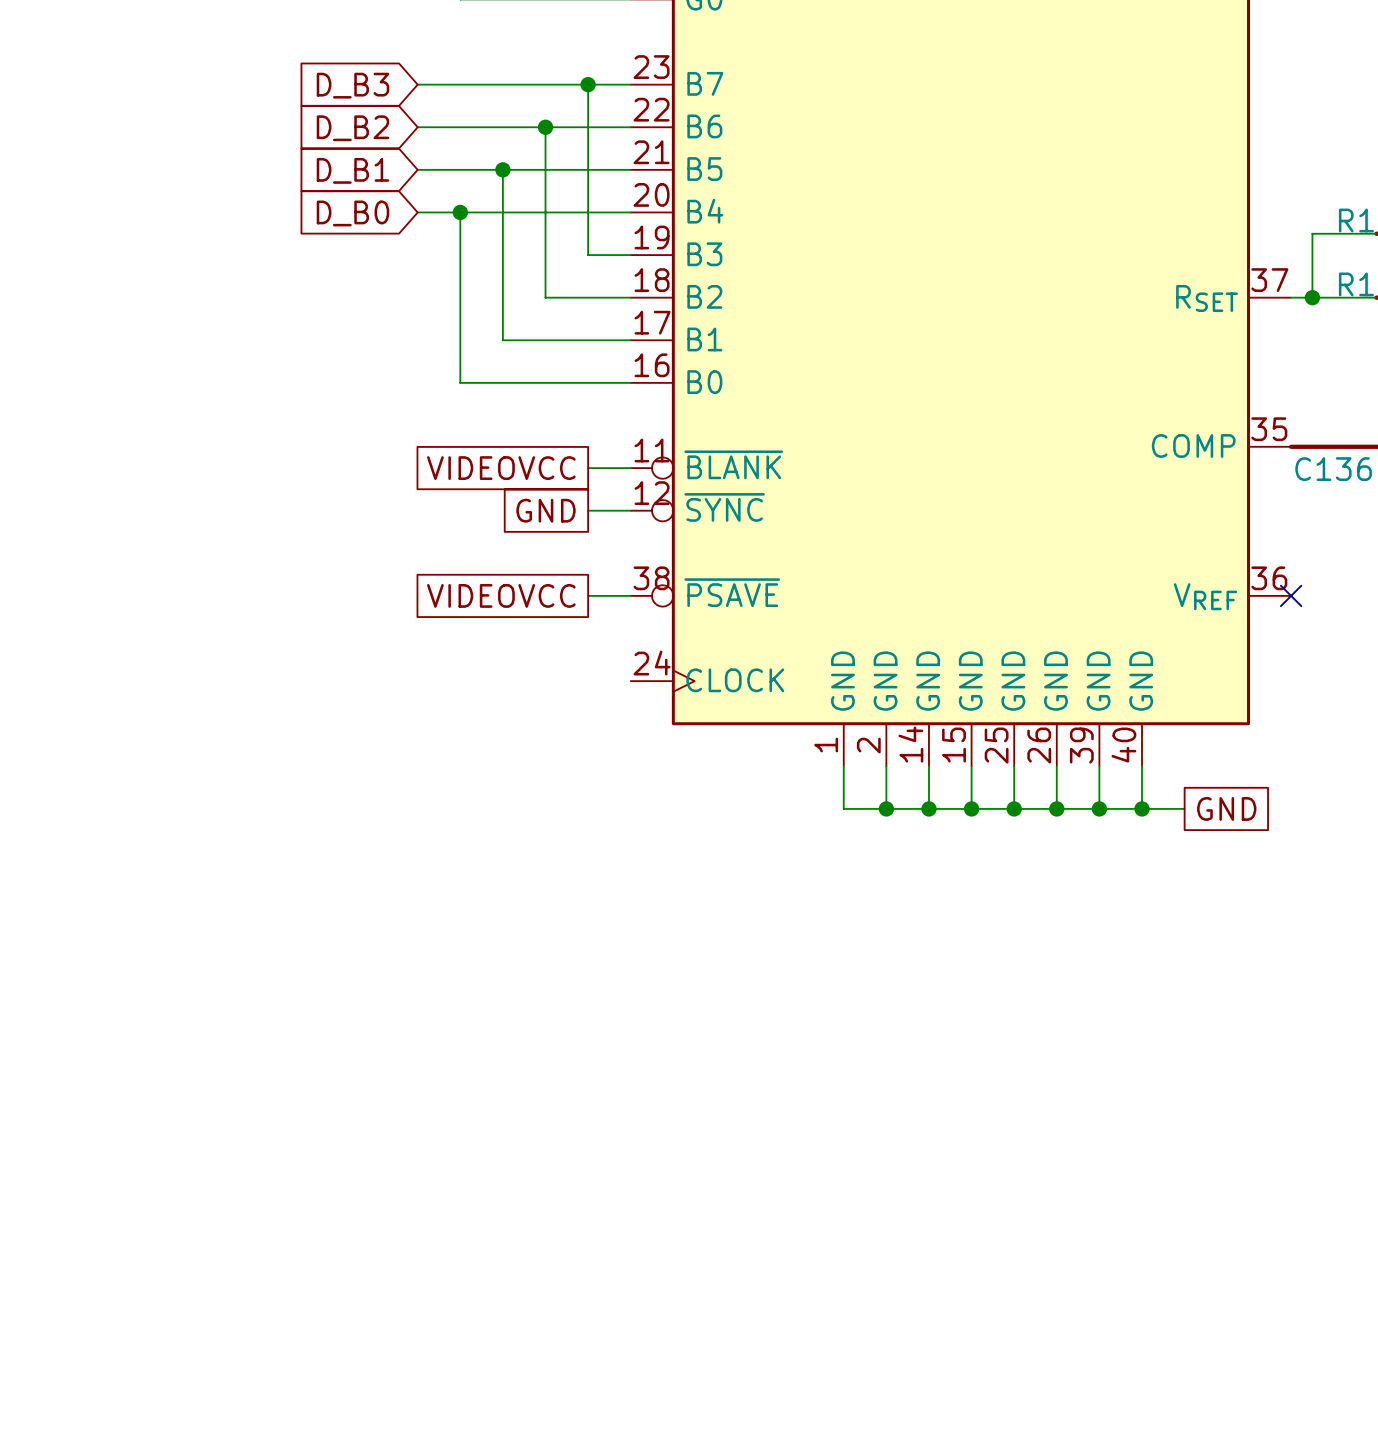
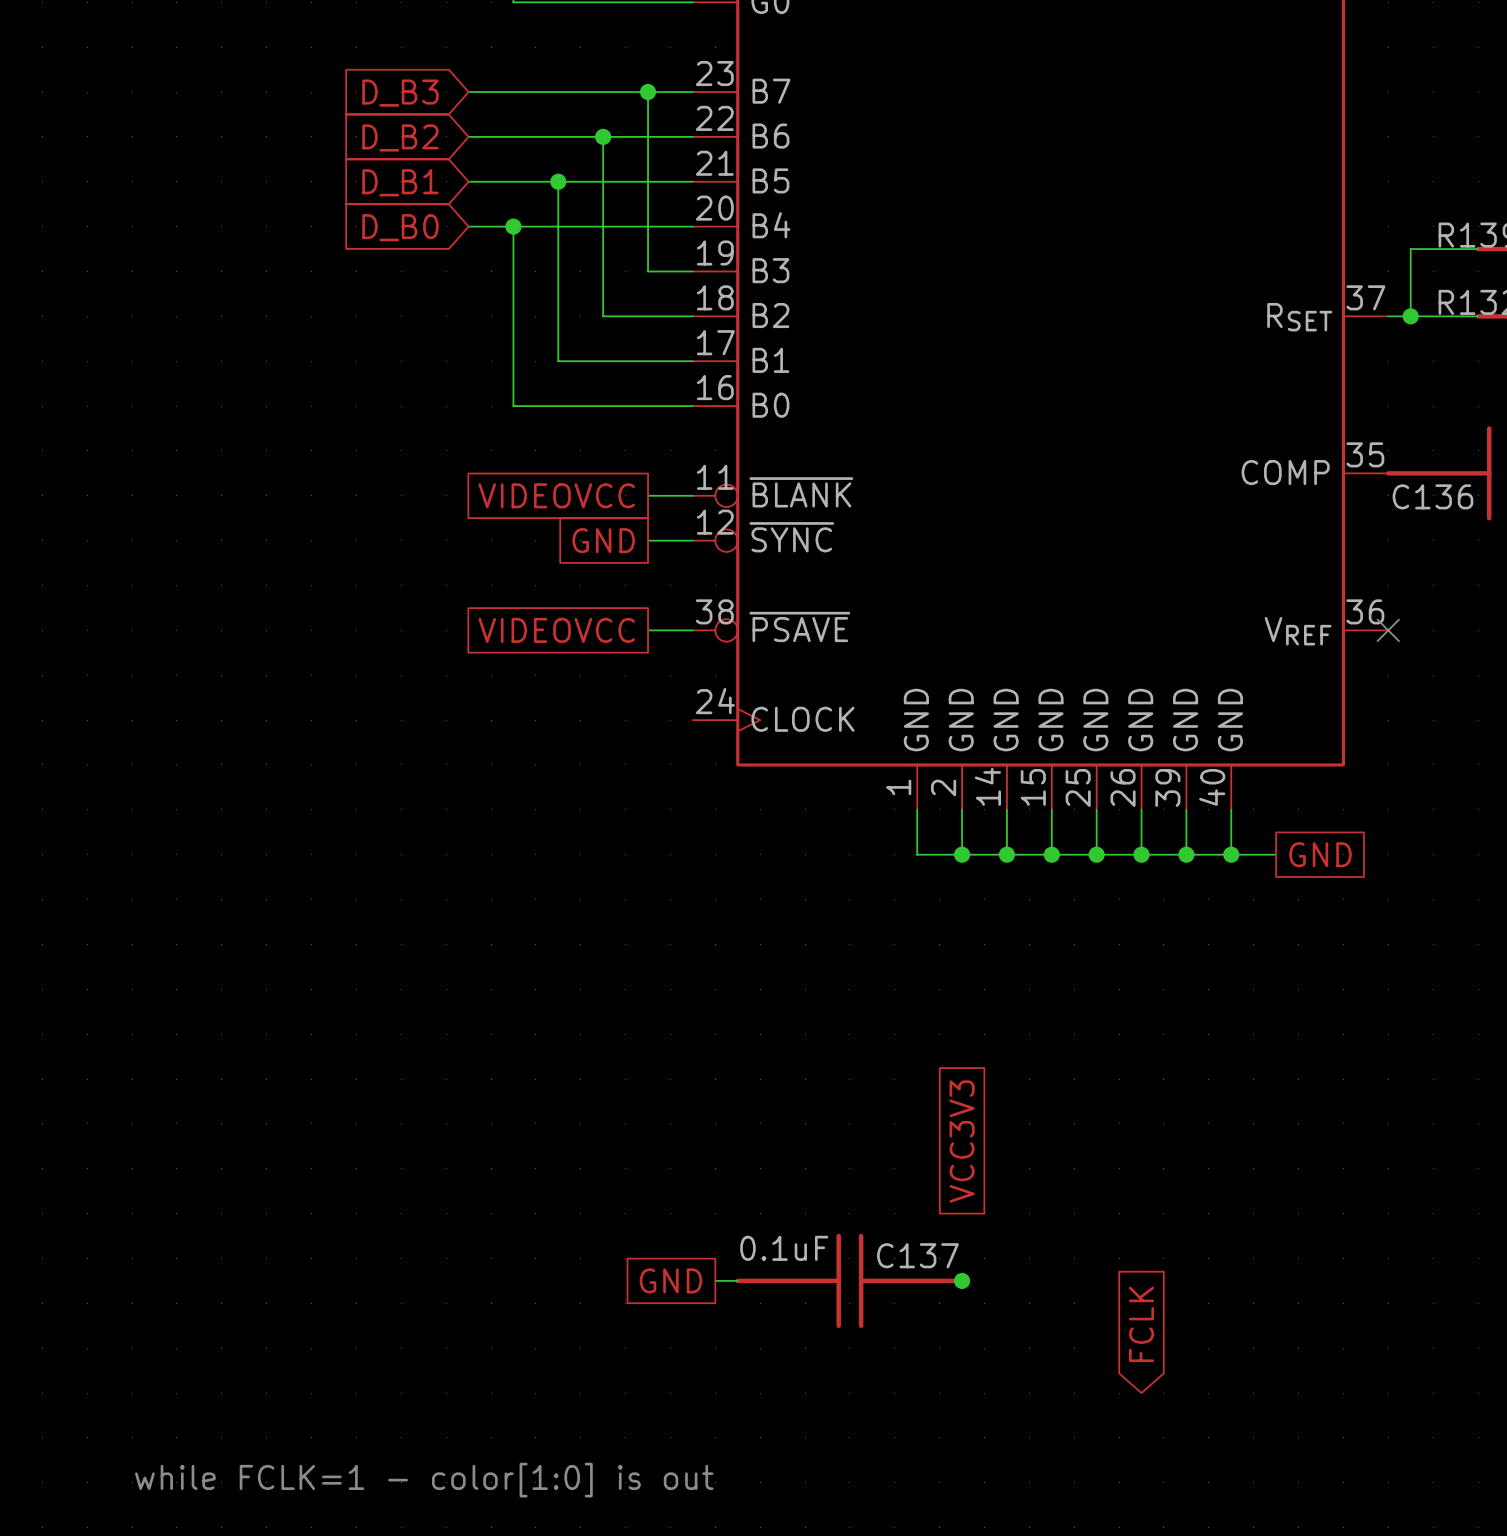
global label: none -> VCC3V3 (962, 1141)
global label: none -> GND (670, 1280)
wire: none -> (715, 1280) (737, 1280)
C137: none -> 0.1uF (849, 1280)
junction: none -> (962, 1280)
global label: none -> FCLK (1141, 1324)
text: none -> while FCLK=1 - color[1:0] is out (424, 1480)

